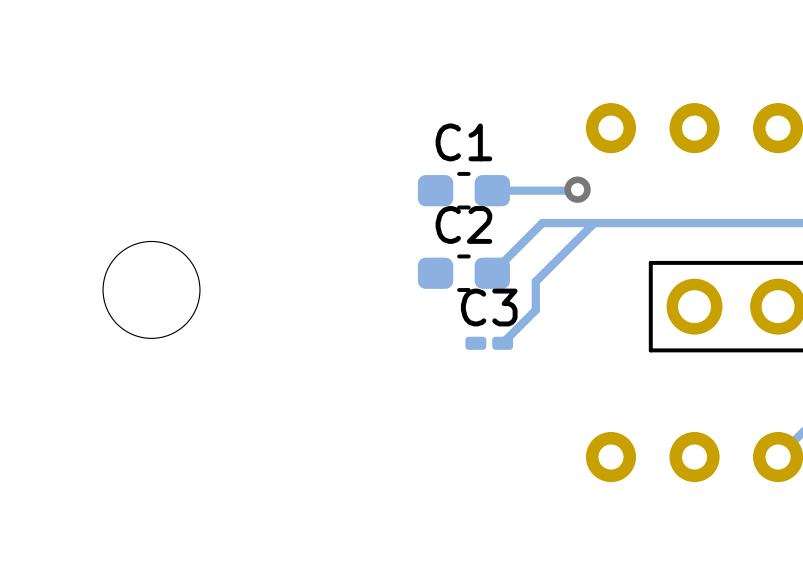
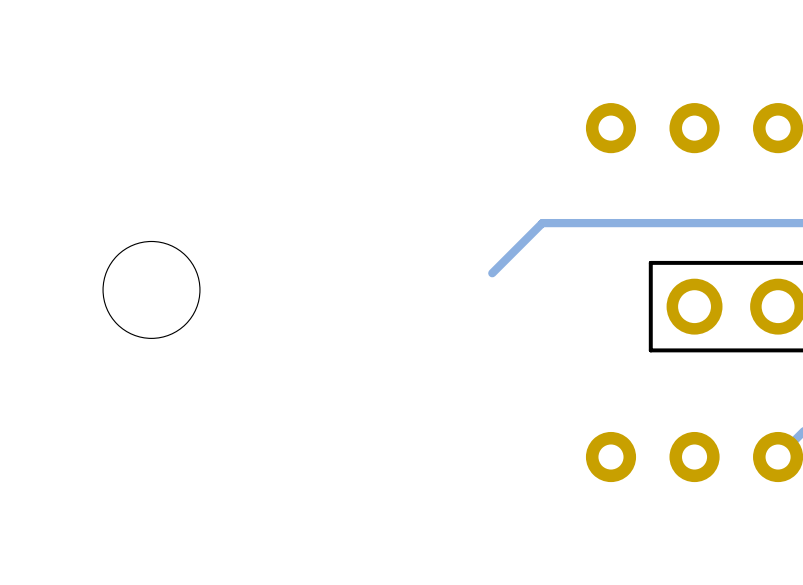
track: (577, 189) (492, 190) -> none
via: (577, 189) -> none
C1: (463, 190) -> none
track: (594, 223) (535, 281) (535, 310) (502, 343) -> none
C2: (463, 273) -> none
C3: (489, 343) -> none

